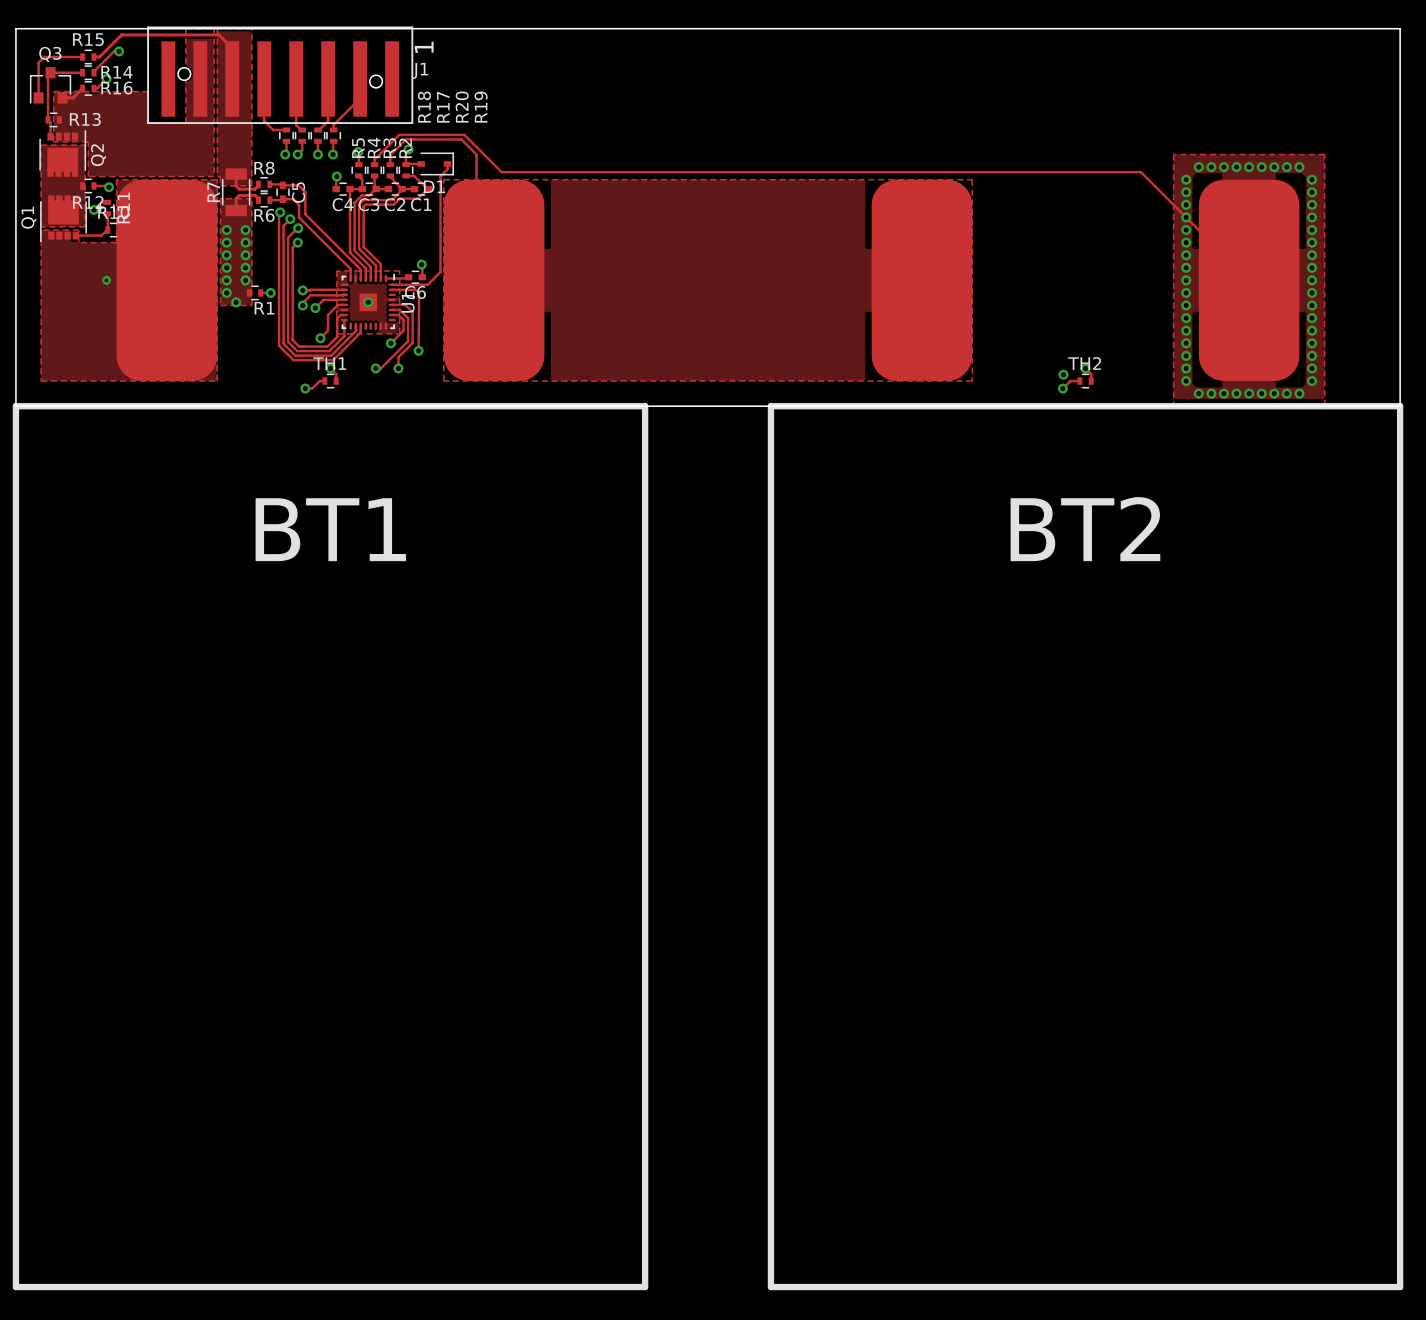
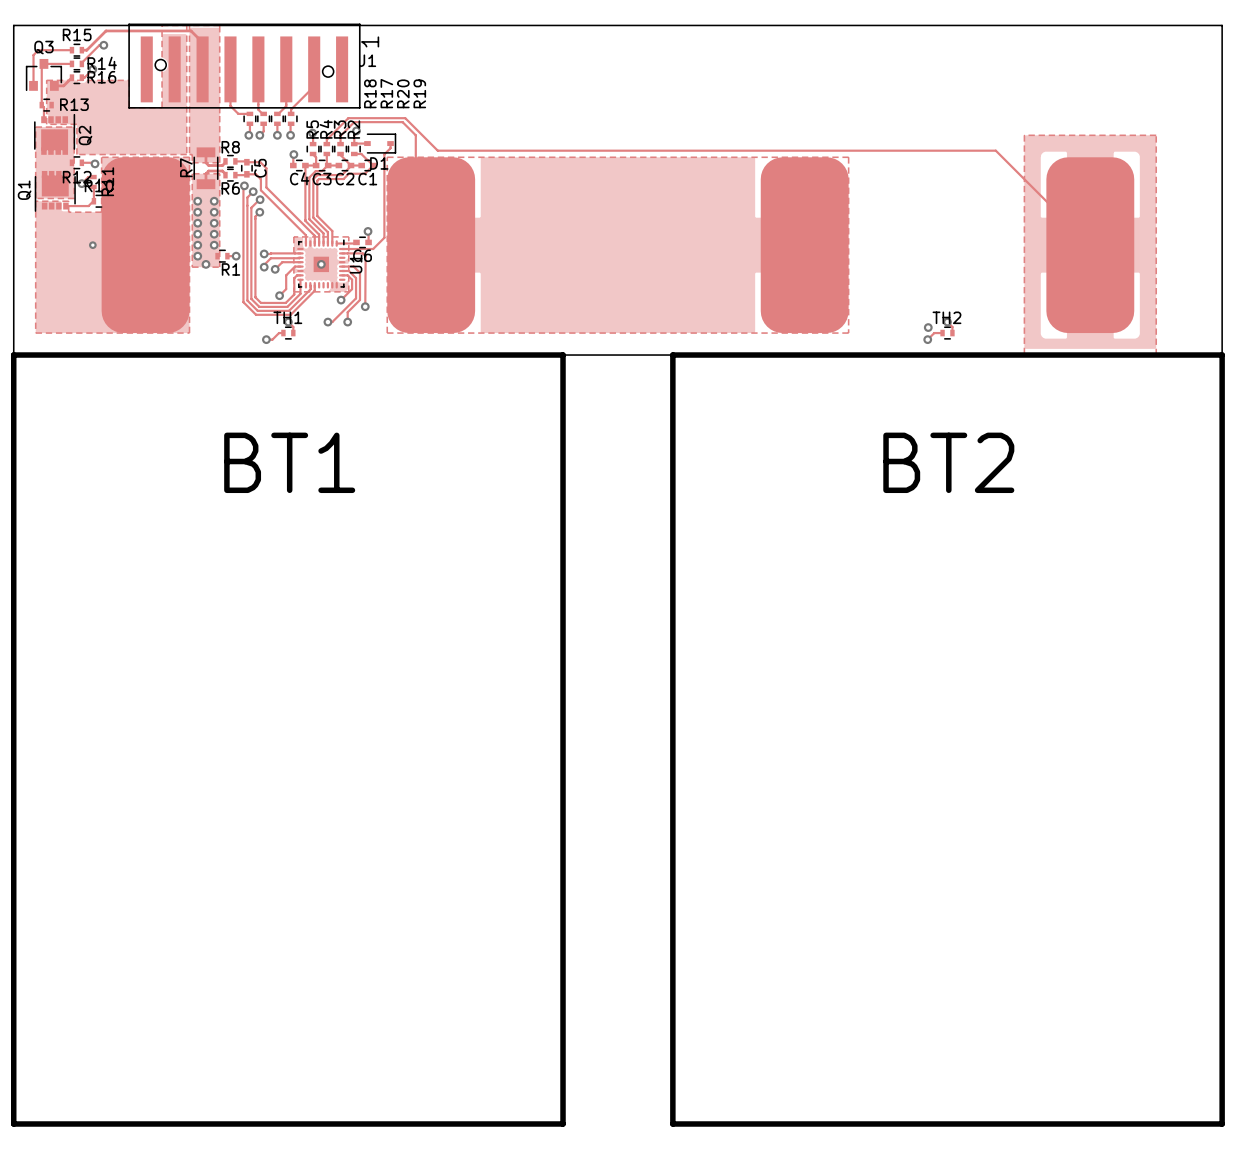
via: (1198, 167) -> none
via: (1211, 167) -> none
via: (1223, 167) -> none
via: (1236, 167) -> none
via: (1249, 167) -> none
via: (1261, 167) -> none
via: (1274, 167) -> none
via: (1286, 167) -> none
via: (1299, 167) -> none
via: (1186, 179) -> none
via: (1312, 179) -> none
via: (1186, 192) -> none
via: (1312, 192) -> none
via: (1186, 204) -> none
via: (1312, 204) -> none
via: (1186, 217) -> none
via: (1312, 217) -> none
via: (1186, 230) -> none
via: (1312, 230) -> none
via: (1186, 242) -> none
via: (1312, 242) -> none
via: (1186, 255) -> none
via: (1312, 255) -> none
via: (1186, 267) -> none
via: (1312, 267) -> none
via: (1186, 280) -> none
via: (1312, 280) -> none
via: (1186, 292) -> none
via: (1312, 292) -> none
via: (1186, 305) -> none
via: (1312, 305) -> none
via: (1186, 318) -> none
via: (1312, 318) -> none
via: (1186, 330) -> none
via: (1312, 330) -> none
via: (1186, 343) -> none
via: (1312, 343) -> none
via: (1186, 355) -> none
via: (1312, 355) -> none
via: (1186, 368) -> none
via: (1312, 368) -> none
via: (1186, 381) -> none
via: (1312, 381) -> none
via: (1198, 393) -> none
via: (1211, 393) -> none
via: (1223, 393) -> none
via: (1236, 393) -> none
via: (1249, 393) -> none
via: (1261, 393) -> none
via: (1274, 393) -> none
via: (1286, 393) -> none
via: (1299, 393) -> none

